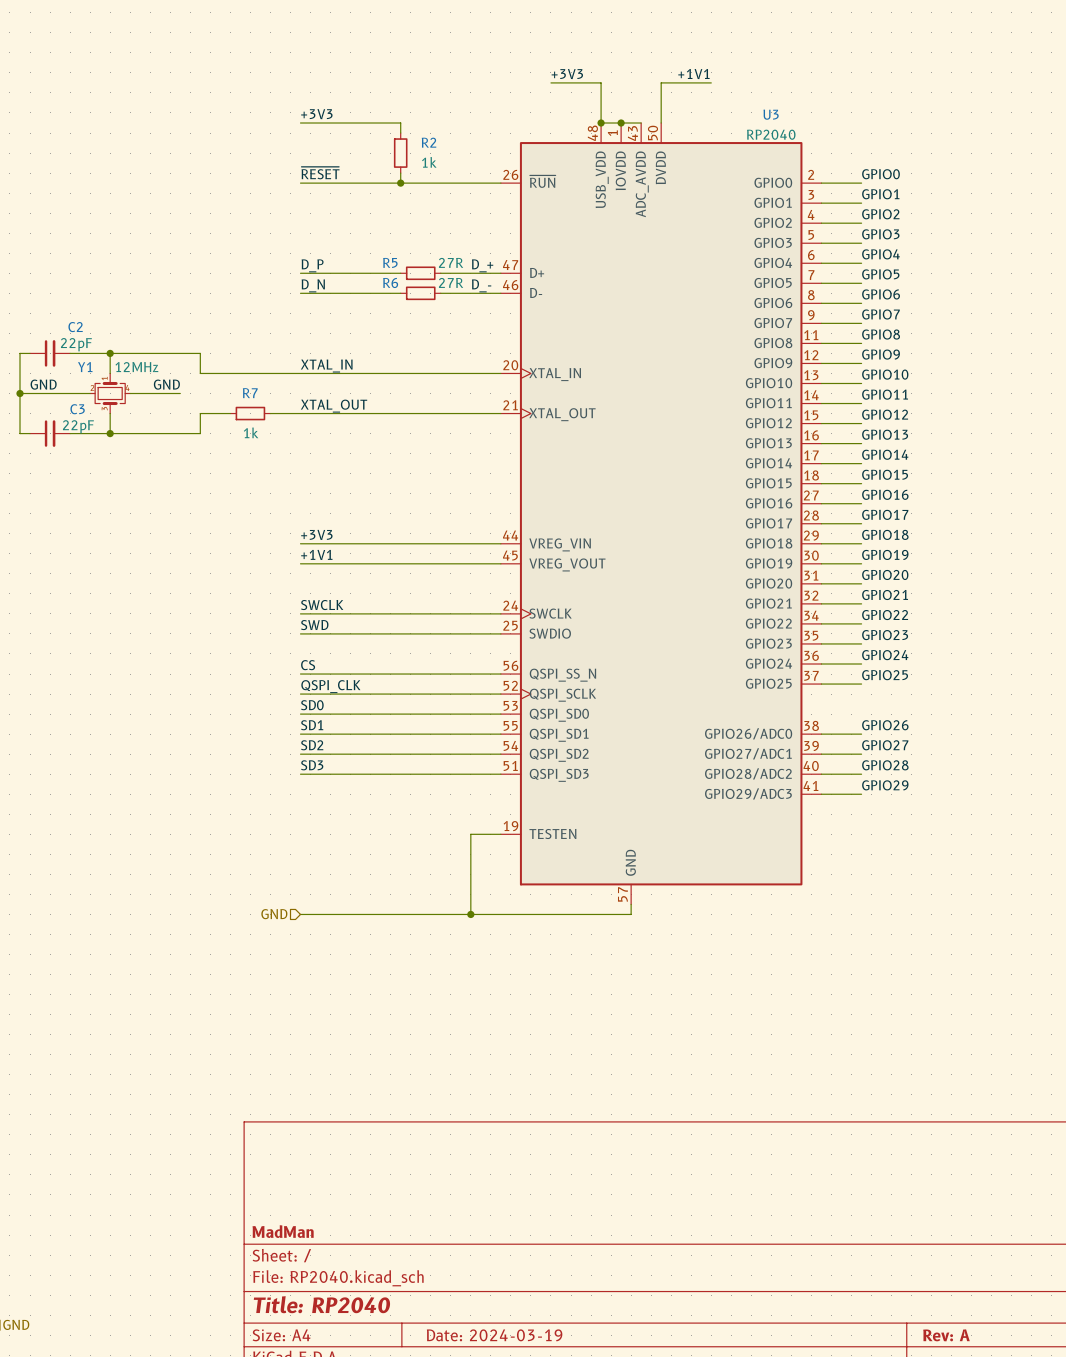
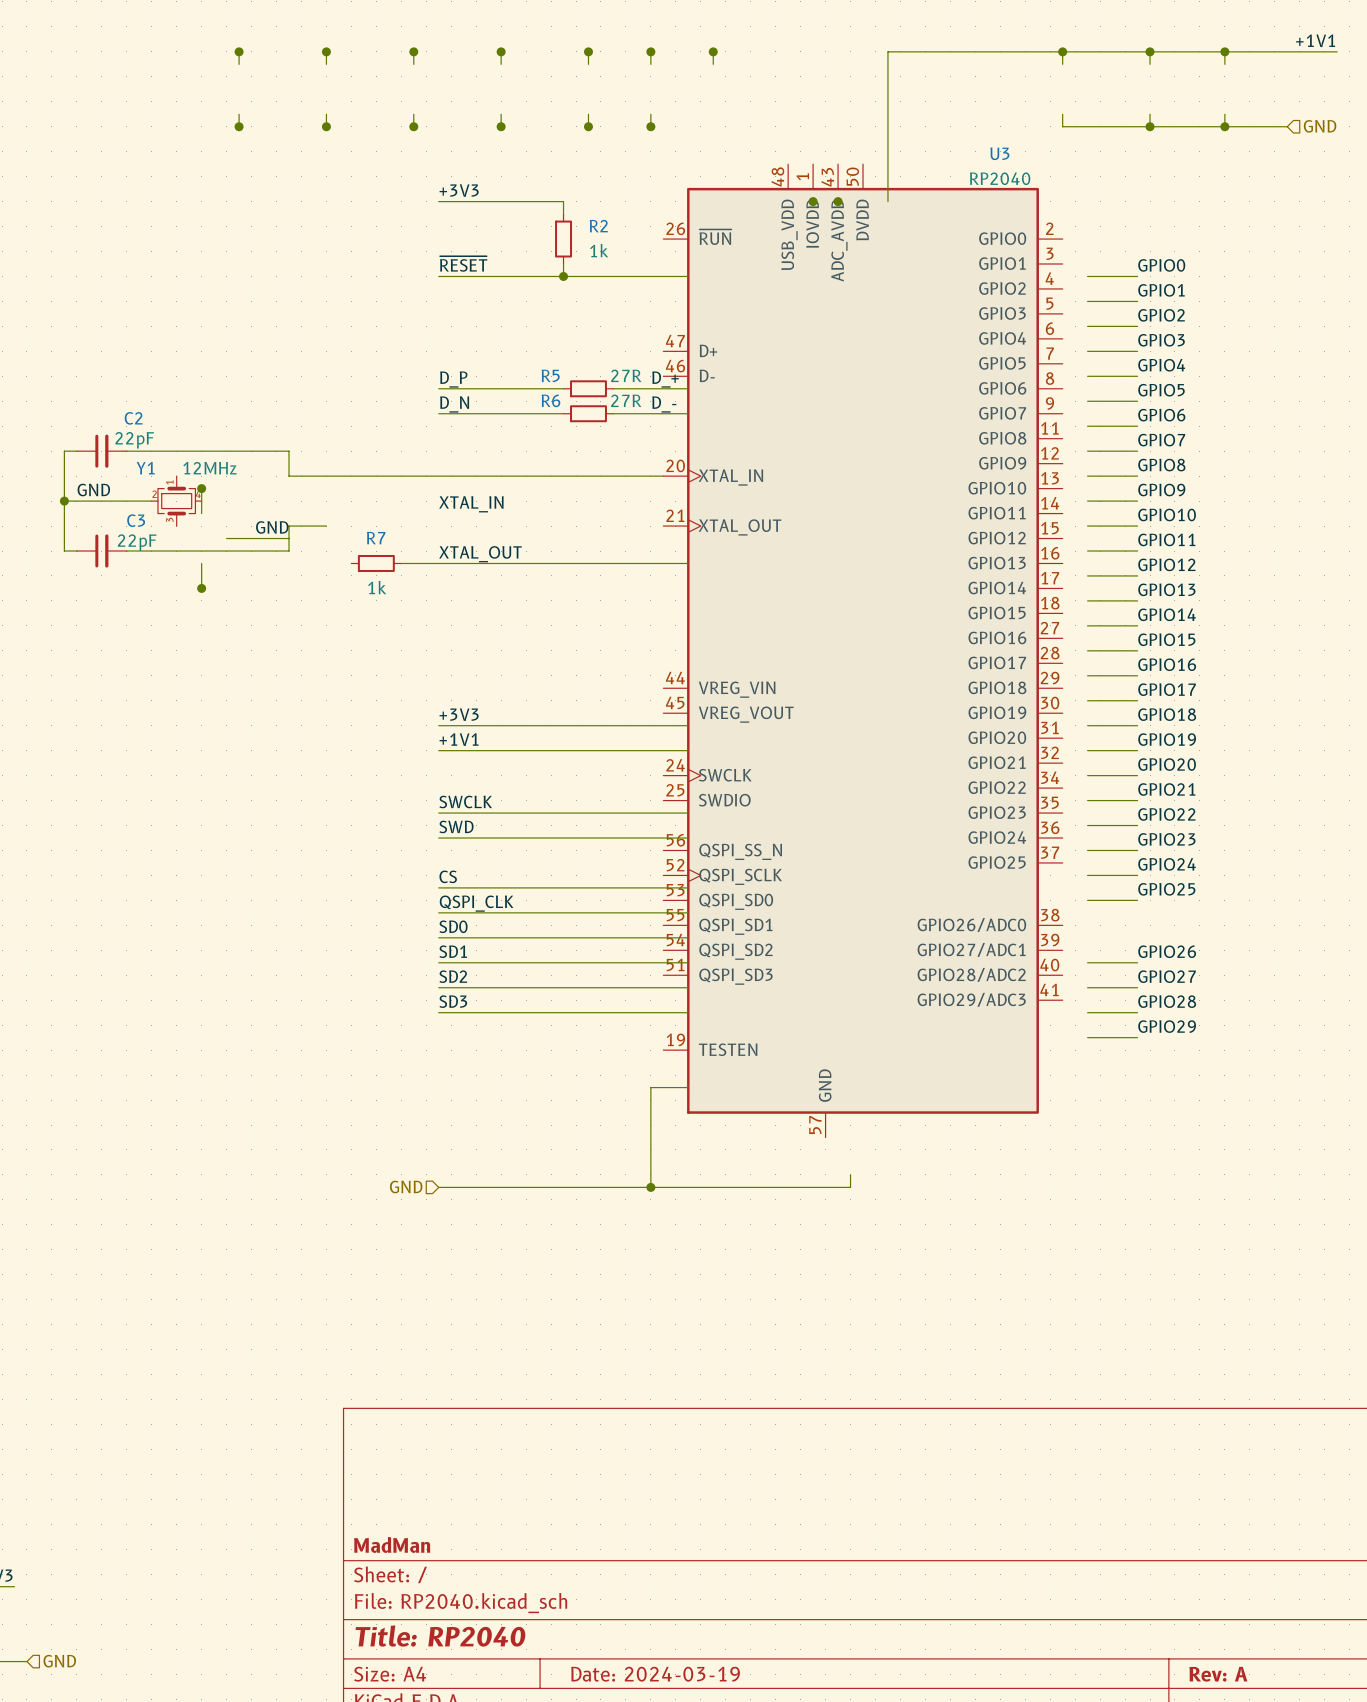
label: none -> +1V1 (1315, 40)
wire: none -> (239, 51) (239, 64)
junction: none -> (239, 51)
wire: none -> (326, 51) (326, 64)
junction: none -> (326, 51)
wire: none -> (413, 51) (413, 64)
junction: none -> (413, 51)
wire: none -> (501, 51) (501, 64)
junction: none -> (501, 51)
wire: none -> (588, 51) (588, 64)
junction: none -> (588, 51)
wire: none -> (650, 51) (650, 64)
junction: none -> (650, 51)
wire: none -> (713, 51) (713, 64)
junction: none -> (713, 51)
wire: none -> (1062, 51) (1062, 64)
junction: none -> (1062, 51)
wire: none -> (1150, 51) (1150, 64)
junction: none -> (1150, 51)
wire: none -> (1224, 51) (1224, 64)
junction: none -> (1224, 51)
wire: none -> (1337, 51) (887, 51) (887, 201)
label: +3V3 (567, 74) -> none
label: +1V1 (693, 74) -> none
wire: none -> (239, 114) (239, 126)
wire: none -> (326, 114) (326, 126)
wire: none -> (413, 114) (413, 126)
wire: none -> (501, 114) (501, 126)
wire: none -> (588, 114) (588, 126)
wire: none -> (650, 114) (650, 126)
wire: (550, 82) (601, 82) (601, 123) (641, 123) -> none
wire: (711, 82) (661, 82) (661, 123) -> none
wire: none -> (1062, 114) (1062, 126) (1287, 126)
wire: none -> (1150, 114) (1150, 126)
wire: none -> (1224, 114) (1224, 126)
junction: none -> (239, 126)
junction: none -> (326, 126)
junction: none -> (413, 126)
junction: none -> (501, 126)
junction: none -> (588, 126)
junction: none -> (650, 126)
junction: none -> (1150, 126)
junction: none -> (1224, 126)
hierarchical label: none -> GND (1320, 126)
label position: +3V3 (316, 114) -> +3V3 (459, 190)
wire: (300, 123) (400, 123) (400, 133) -> (438, 201) (563, 201) (563, 214)
junction: (601, 123) -> none
junction: (621, 123) -> none
R2 position: (400, 153) -> (563, 239)
junction: none -> (813, 201)
junction: none -> (838, 201)
label position: ~{RESET} (320, 173) -> ~{RESET} (463, 263)
wire: (400, 173) (400, 183) -> (563, 264) (563, 276)
label position: GPIO0 (880, 174) -> GPIO0 (1161, 265)
wire: (300, 183) (500, 183) -> (438, 276) (688, 276)
junction position: (400, 183) -> (563, 276)
wire: (821, 183) (861, 183) -> (1087, 276) (1137, 276)
label position: GPIO1 (880, 194) -> GPIO1 (1161, 290)
wire: (821, 203) (861, 203) -> (1087, 301) (1137, 301)
label position: GPIO2 (880, 214) -> GPIO2 (1161, 315)
wire: (821, 223) (861, 223) -> (1087, 326) (1137, 326)
label position: GPIO3 (880, 234) -> GPIO3 (1161, 340)
wire: (821, 243) (861, 243) -> (1087, 351) (1137, 351)
label position: GPIO4 (880, 254) -> GPIO4 (1161, 365)
wire: (821, 263) (861, 263) -> (1087, 376) (1137, 376)
label position: D_P (312, 265) -> D_P (453, 379)
label position: D_+ (482, 265) -> D_+ (665, 379)
wire: (300, 273) (400, 273) -> (438, 388) (563, 388)
R5 position: (420, 273) -> (588, 388)
wire: (440, 273) (500, 273) -> (613, 388) (688, 388)
label position: GPIO5 (880, 274) -> GPIO5 (1161, 390)
wire: (821, 283) (861, 283) -> (1087, 401) (1137, 401)
label position: D_N (313, 285) -> D_N (454, 404)
label position: D_- (481, 285) -> D_- (664, 404)
wire: (300, 293) (400, 293) -> (438, 413) (563, 413)
R6 position: (420, 293) -> (588, 413)
wire: (440, 293) (500, 293) -> (613, 413) (688, 413)
label position: GPIO6 (881, 294) -> GPIO6 (1161, 415)
wire: (821, 303) (861, 303) -> (1087, 426) (1137, 426)
label position: GPIO7 (880, 314) -> GPIO7 (1161, 440)
wire: (821, 323) (861, 323) -> (1087, 451) (1137, 451)
label position: GPIO8 (881, 334) -> GPIO8 (1161, 465)
wire: (821, 343) (861, 343) -> (1087, 476) (1137, 476)
wire: (110, 353) (110, 373) -> (201, 488) (201, 513)
junction: (110, 353) -> none
label position: GPIO9 (881, 354) -> GPIO9 (1161, 490)
wire: (821, 363) (861, 363) -> (1087, 501) (1137, 501)
label position: XTAL_IN (326, 366) -> XTAL_IN (471, 504)
label position: GPIO10 (885, 374) -> GPIO10 (1167, 514)
junction: none -> (201, 488)
wire: (821, 383) (861, 383) -> (1087, 526) (1137, 526)
label position: GND (166, 384) -> GND (272, 527)
wire: (130, 393) (180, 393) -> (226, 538) (289, 538)
label position: GPIO11 (885, 394) -> GPIO11 (1166, 539)
wire: (821, 403) (861, 403) -> (1087, 551) (1137, 551)
label position: XTAL_OUT (334, 406) -> XTAL_OUT (480, 554)
wire: (110, 413) (110, 433) -> (201, 563) (201, 588)
R7 position: (250, 413) -> (376, 563)
wire: (270, 413) (500, 413) -> (401, 563) (688, 563)
label position: GPIO12 (885, 414) -> GPIO12 (1166, 564)
wire: (821, 423) (861, 423) -> (1087, 575) (1137, 575)
junction: (110, 433) -> none
label position: GPIO13 (885, 434) -> GPIO13 (1166, 589)
wire: (821, 443) (861, 443) -> (1087, 600) (1137, 600)
label position: GPIO14 (885, 454) -> GPIO14 (1167, 614)
junction: none -> (201, 588)
wire: (821, 463) (861, 463) -> (1087, 625) (1137, 625)
label position: GPIO15 (885, 474) -> GPIO15 (1166, 639)
wire: (821, 483) (861, 483) -> (1087, 650) (1137, 650)
label position: GPIO16 (885, 494) -> GPIO16 (1167, 664)
wire: (821, 503) (861, 503) -> (1087, 675) (1137, 675)
label position: GPIO17 (885, 514) -> GPIO17 (1167, 689)
wire: (821, 523) (861, 523) -> (1087, 700) (1137, 700)
label position: +3V3 (316, 534) -> +3V3 (459, 714)
label position: GPIO18 (885, 534) -> GPIO18 (1167, 714)
wire: (300, 543) (500, 543) -> (438, 725) (688, 725)
wire: (821, 543) (861, 543) -> (1087, 725) (1137, 725)
label position: +1V1 (316, 554) -> +1V1 (459, 739)
label position: GPIO19 (885, 554) -> GPIO19 (1167, 739)
wire: (300, 563) (500, 563) -> (438, 750) (688, 750)
wire: (821, 563) (861, 563) -> (1087, 750) (1137, 750)
label position: GPIO20 (885, 574) -> GPIO20 (1167, 764)
wire: (821, 583) (861, 583) -> (1087, 775) (1137, 775)
label position: GPIO21 (885, 595) -> GPIO21 (1166, 789)
wire: (821, 603) (861, 603) -> (1087, 800) (1137, 800)
label position: SWCLK (322, 605) -> SWCLK (465, 801)
wire: (300, 613) (500, 613) -> (438, 813) (688, 813)
label position: GPIO22 (885, 615) -> GPIO22 (1166, 814)
wire: (821, 623) (861, 623) -> (1087, 825) (1137, 825)
label position: SWD (314, 625) -> SWD (456, 826)
wire: (300, 633) (500, 633) -> (438, 838) (688, 838)
label position: GPIO23 (885, 635) -> GPIO23 (1166, 839)
wire: (821, 643) (861, 643) -> (1087, 850) (1137, 850)
label position: GPIO24 (885, 655) -> GPIO24 (1167, 864)
wire: (821, 664) (861, 664) -> (1087, 875) (1137, 875)
label position: CS (308, 665) -> CS (448, 876)
wire: (300, 674) (500, 674) -> (438, 887) (688, 887)
label position: GPIO25 (885, 675) -> GPIO25 (1166, 889)
wire: (821, 684) (861, 684) -> (1087, 900) (1137, 900)
label position: QSPI_CLK (330, 686) -> QSPI_CLK (476, 903)
wire: (300, 694) (500, 694) -> (438, 912) (688, 912)
label position: SD0 (312, 705) -> SD0 (453, 926)
wire: (300, 714) (500, 714) -> (438, 937) (688, 937)
label position: SD1 (312, 725) -> SD1 (453, 951)
label position: GPIO26 (885, 725) -> GPIO26 (1167, 951)
wire: (300, 734) (500, 734) -> (438, 962) (688, 962)
wire: (821, 734) (861, 734) -> (1087, 962) (1137, 962)
label position: SD2 (312, 745) -> SD2 (453, 976)
label position: GPIO27 (885, 745) -> GPIO27 (1167, 976)
wire: (300, 754) (500, 754) -> (438, 987) (688, 987)
wire: (821, 754) (861, 754) -> (1087, 987) (1137, 987)
label position: SD3 (312, 765) -> SD3 (453, 1001)
label position: GPIO28 (885, 765) -> GPIO28 (1167, 1001)
wire: (300, 774) (500, 774) -> (438, 1012) (688, 1012)
wire: (821, 774) (861, 774) -> (1087, 1012) (1137, 1012)
label position: GPIO29 (885, 785) -> GPIO29 (1167, 1026)
wire: (821, 794) (861, 794) -> (1087, 1037) (1137, 1037)
wire: (500, 834) (470, 834) (470, 914) -> (688, 1087) (650, 1087) (650, 1187)
wire: (631, 904) (631, 914) (300, 914) -> (850, 1174) (850, 1187) (438, 1187)
hierarchical label position: GND (274, 914) -> GND (406, 1187)
junction position: (470, 914) -> (650, 1187)

